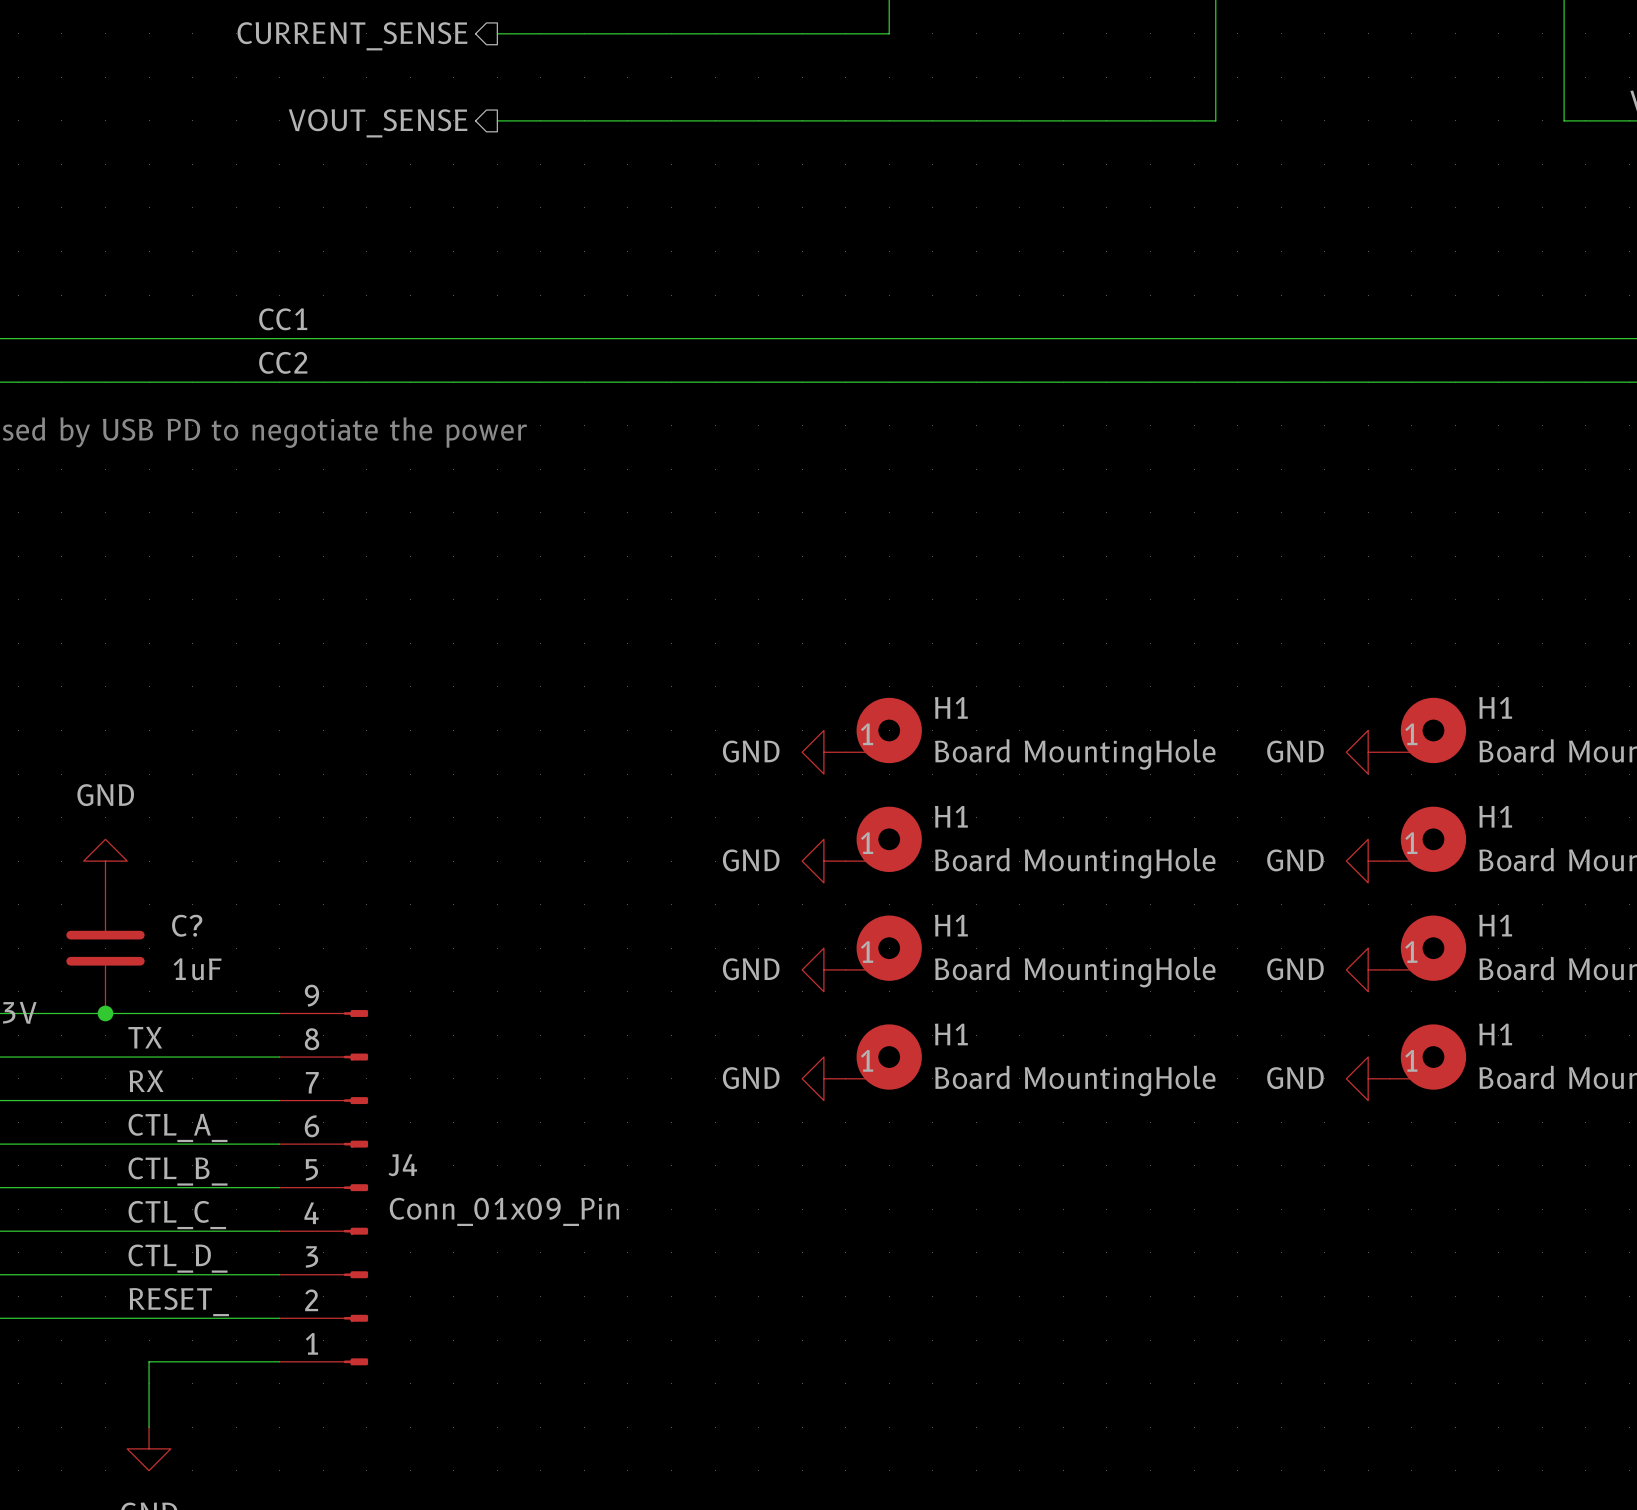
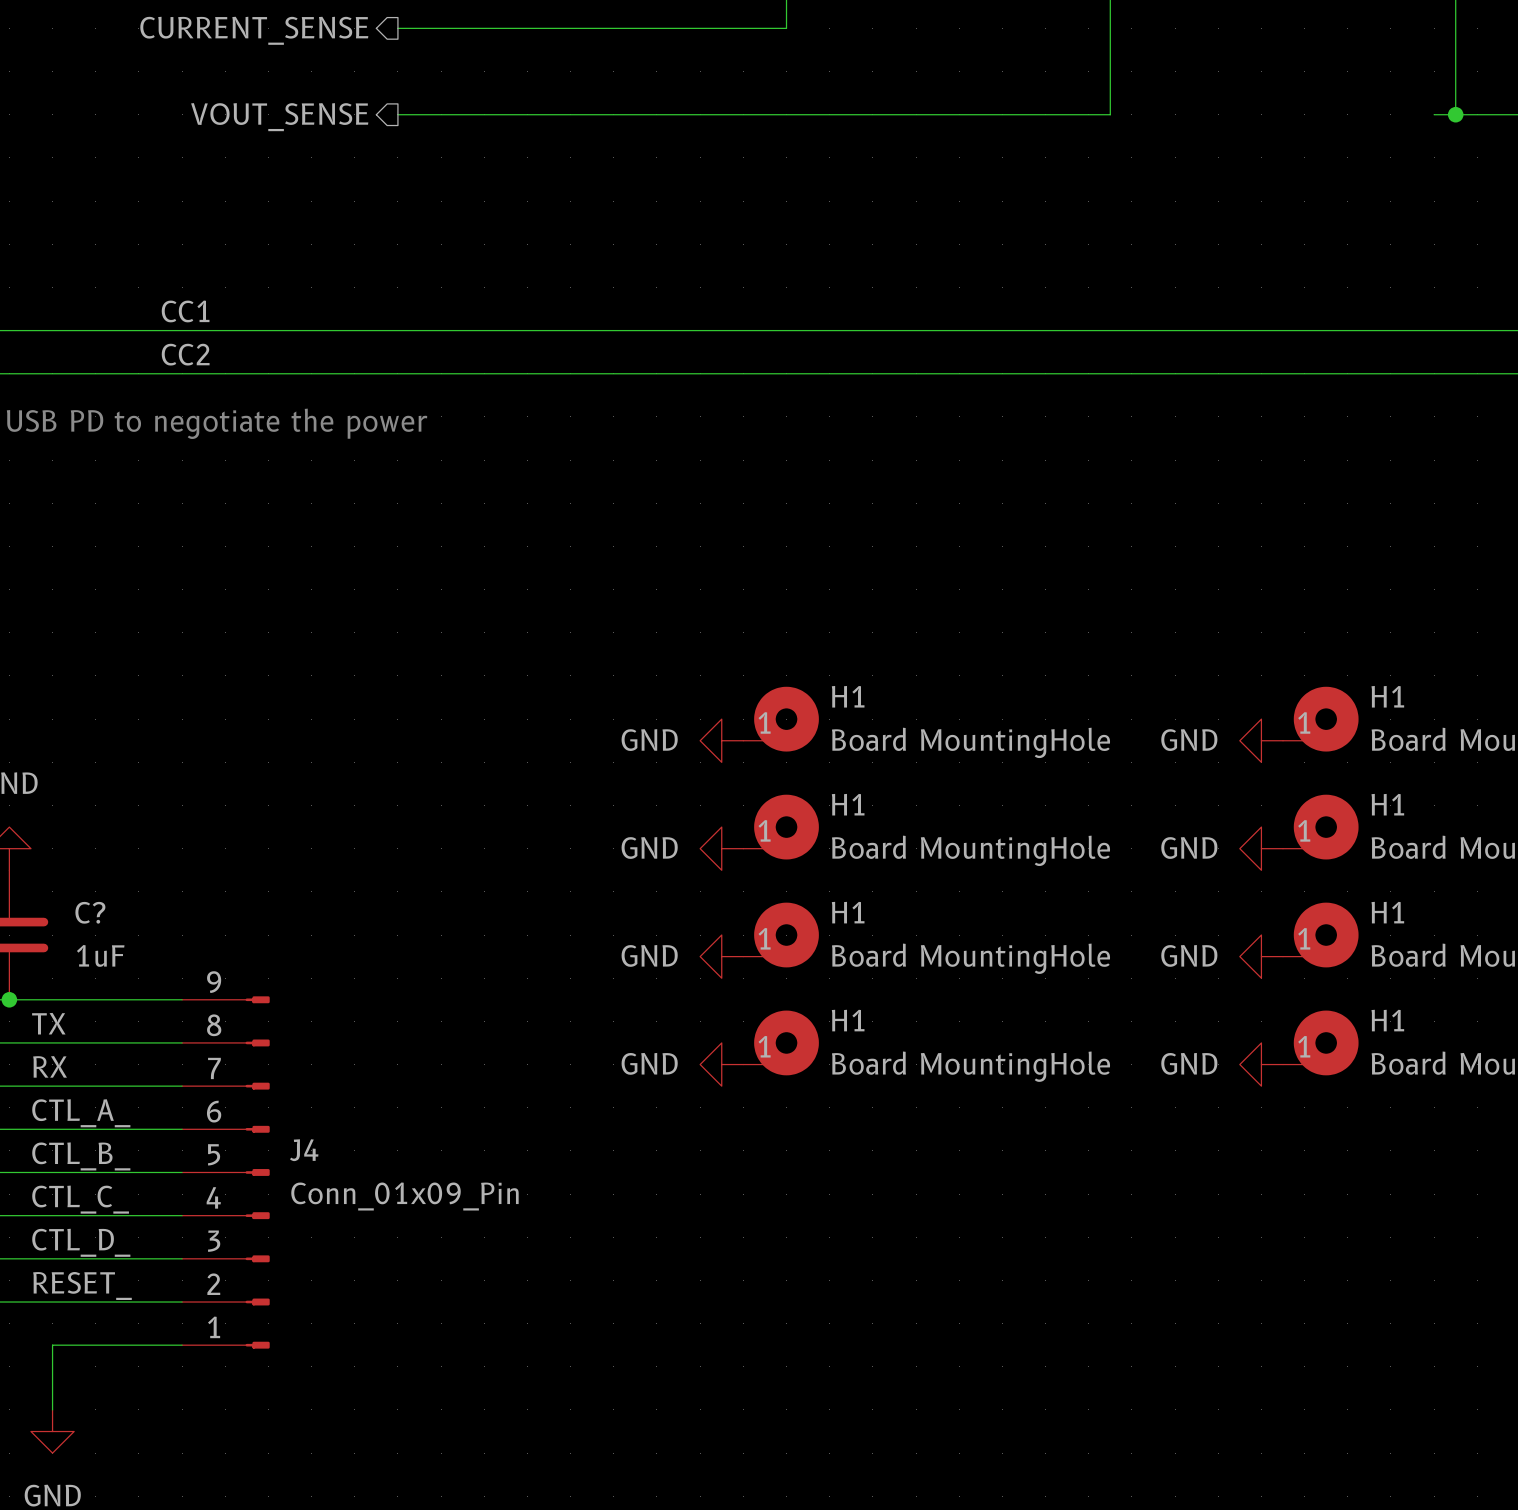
wire: none -> (1434, 114) (1455, 114)
junction: none -> (1455, 114)

